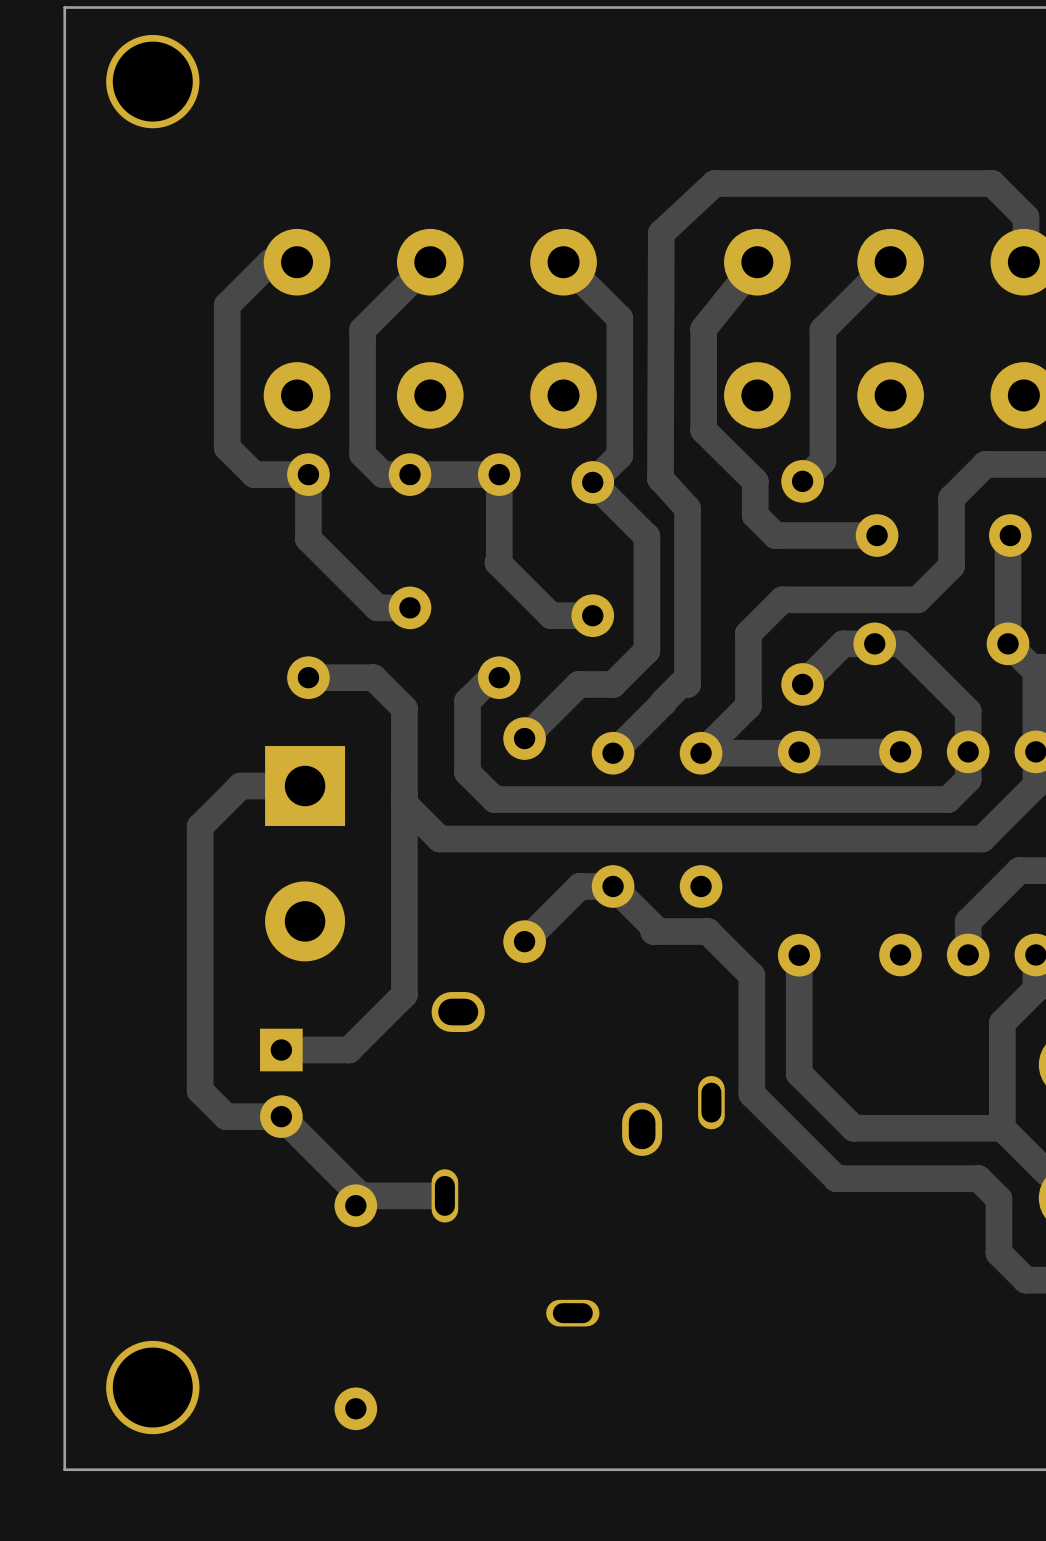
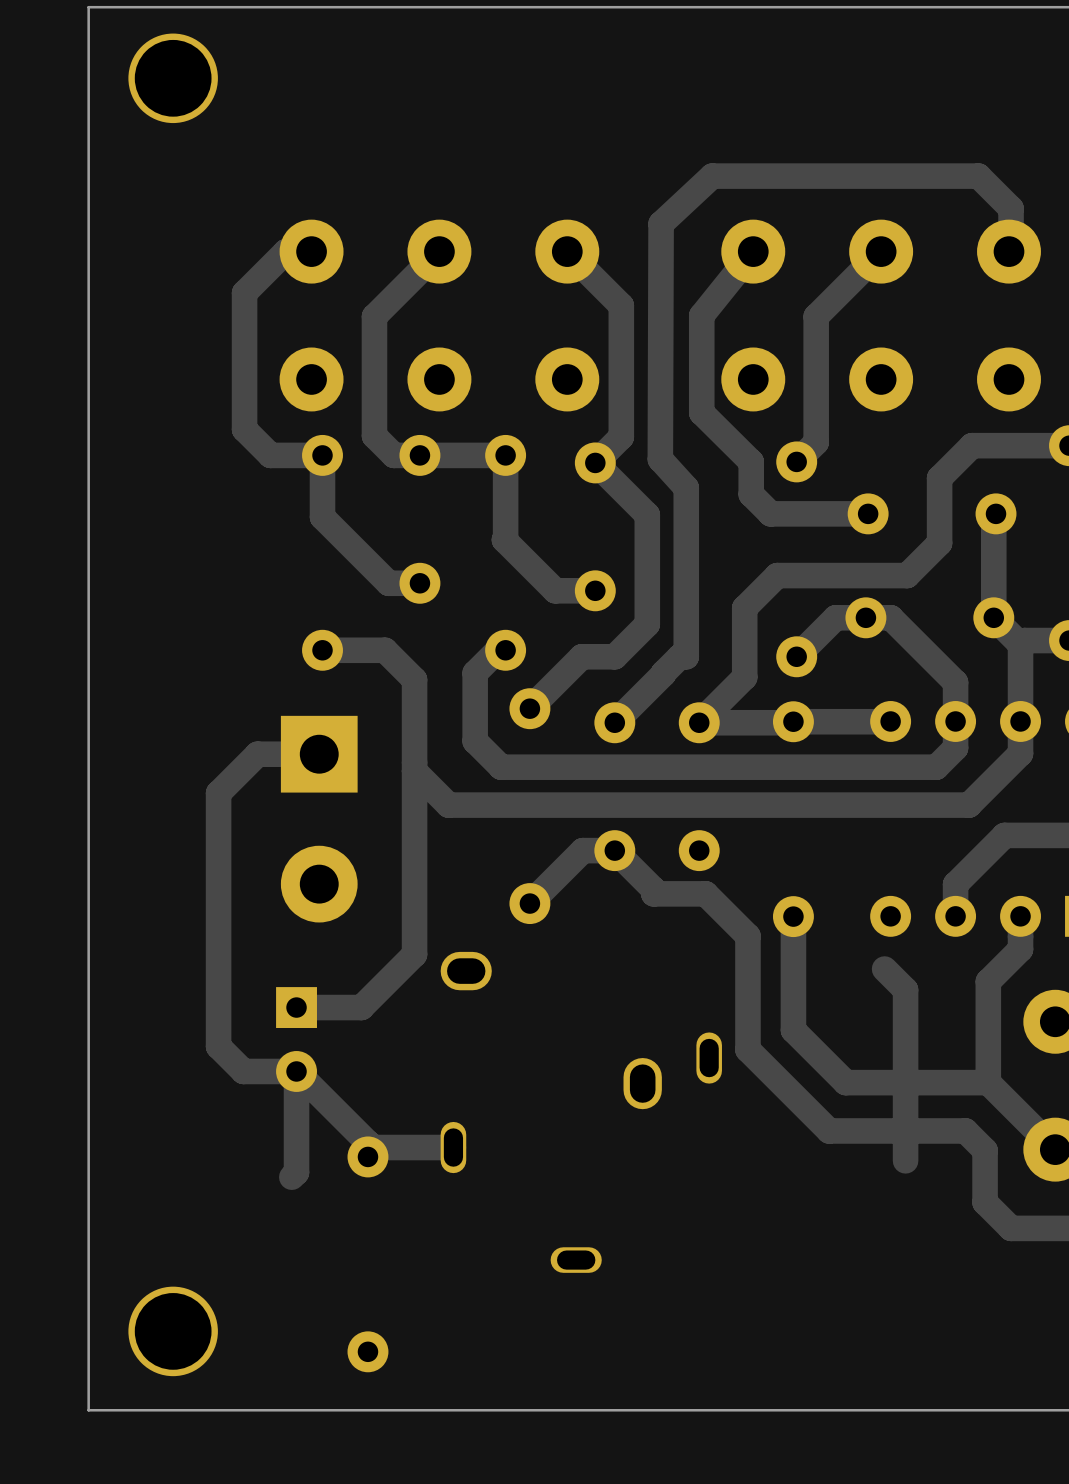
track: none -> (884, 969) (905, 990) (905, 1160)
track: none -> (296, 1071) (296, 1172) (291, 1177)

